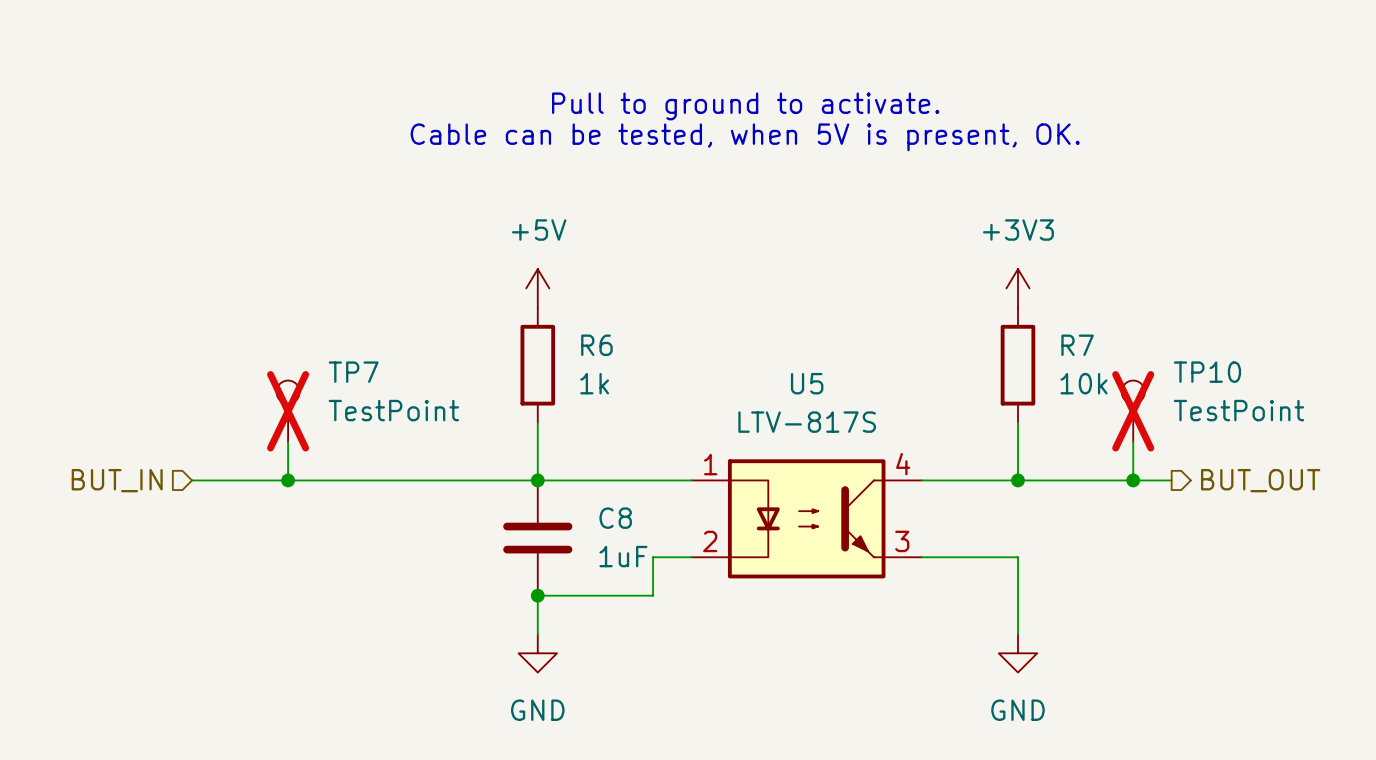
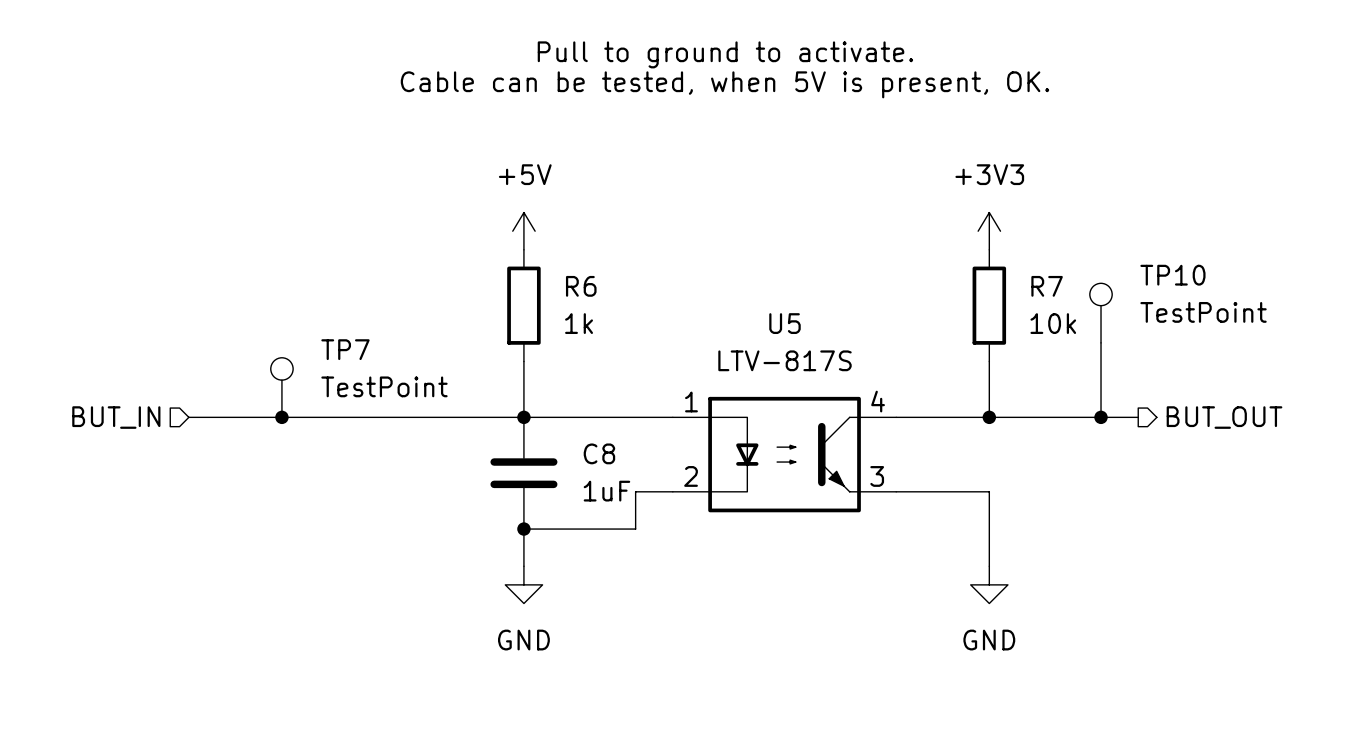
TP7 position: (288, 411) -> (281, 387)
TP7 do-not-place cross: (288, 411) -> none
TP10 position: (1133, 411) -> (1101, 313)
TP10 do-not-place cross: (1133, 411) -> none

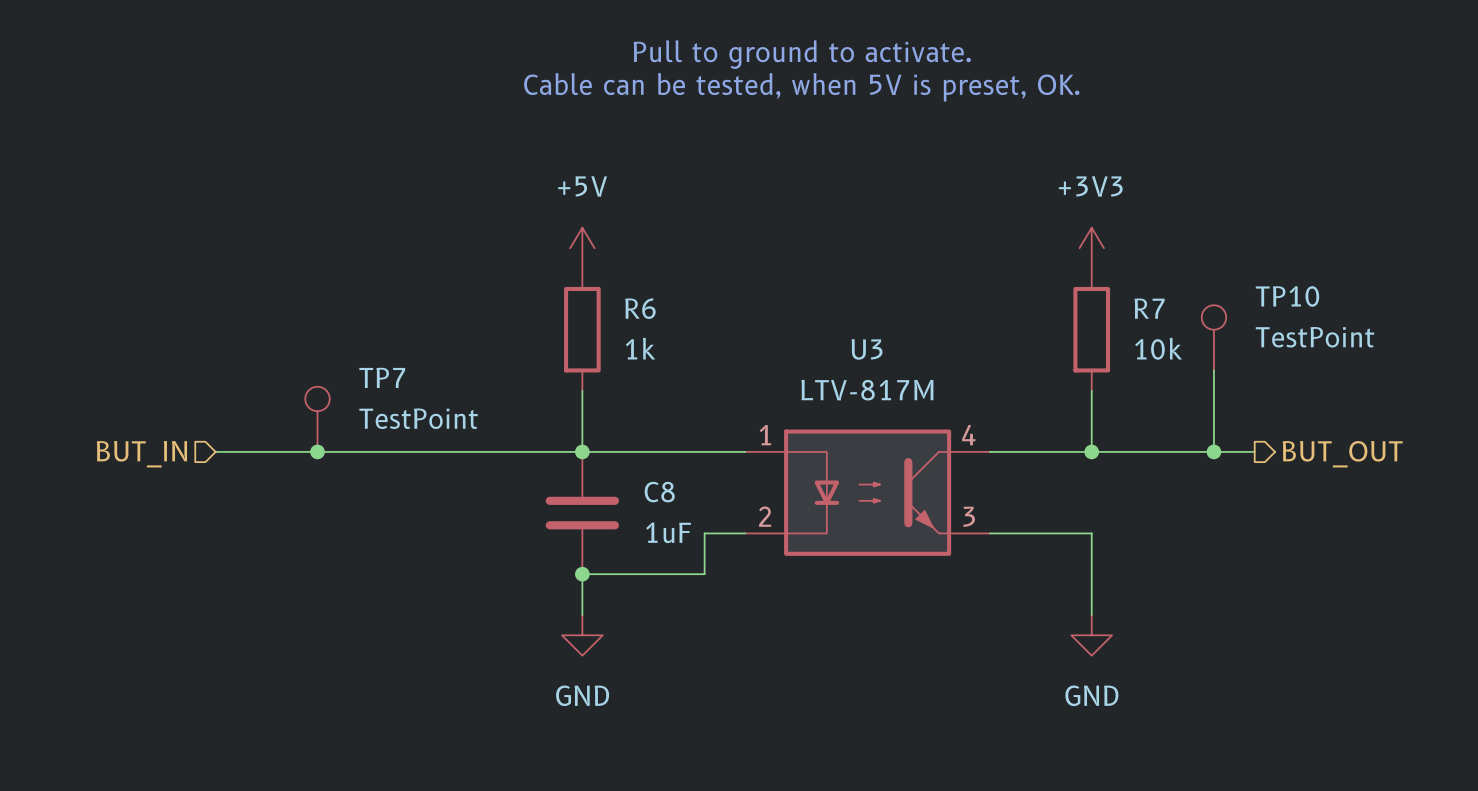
text: Cable can be tested, when 5V is present, OK. (724, 84) -> Cable can be tested, when 5V is preset, OK. (801, 87)
U5 name: U5 (785, 323) -> U3 (866, 349)
U5 value: LTV-817S (785, 360) -> LTV-817M (867, 390)

